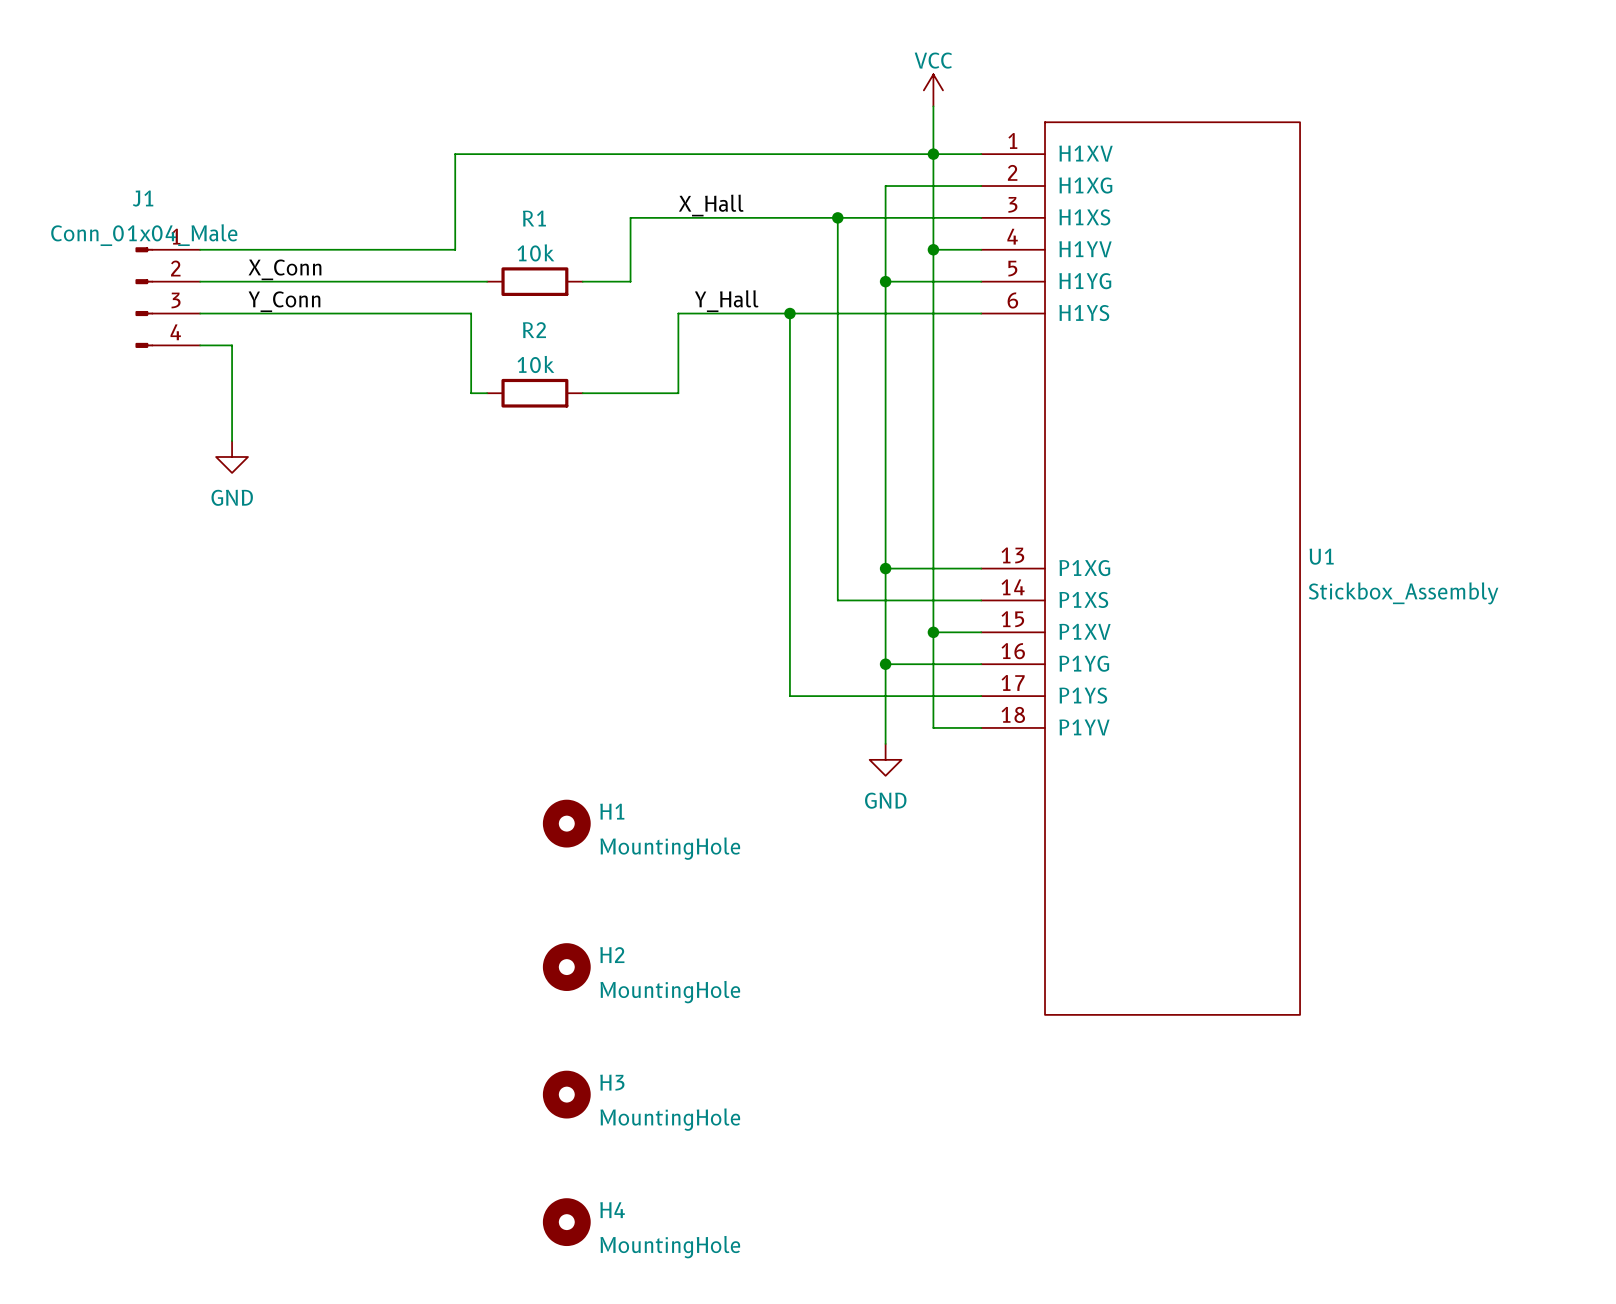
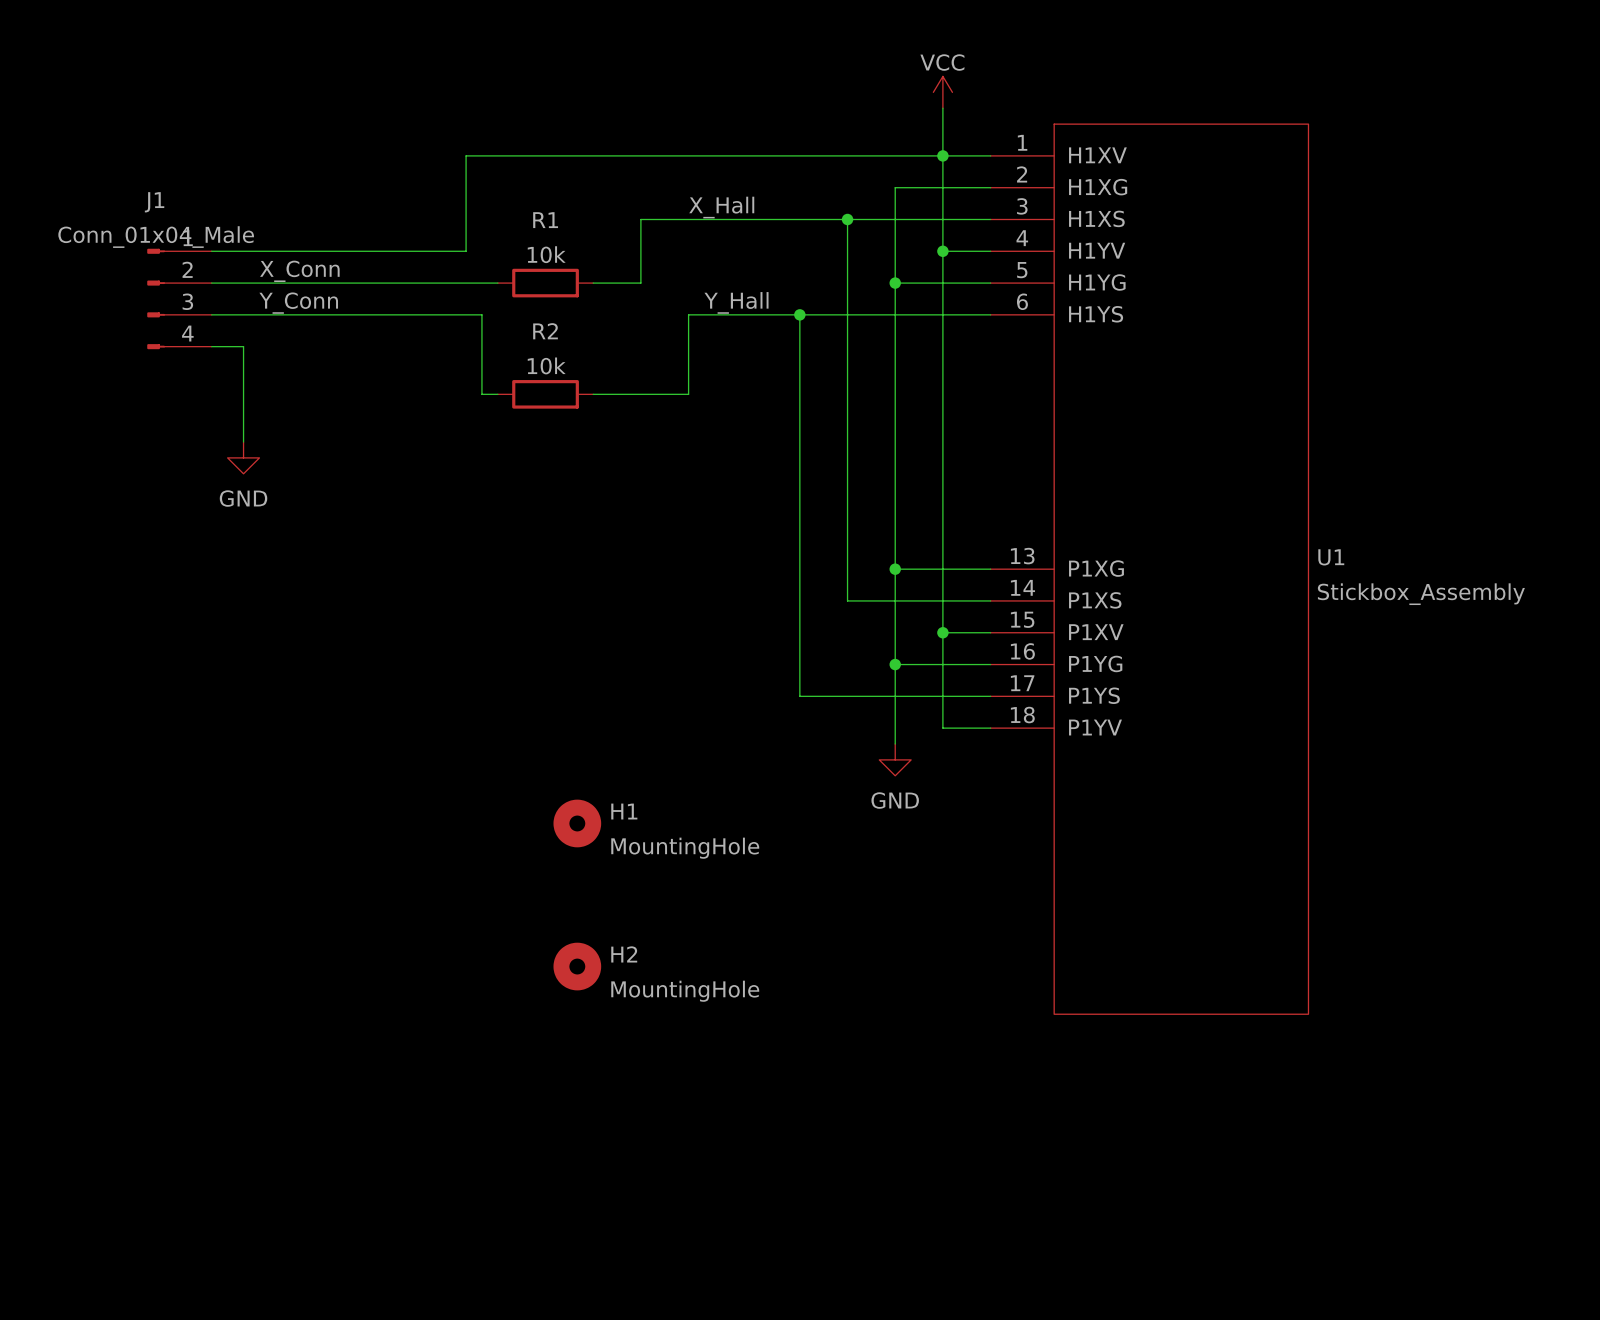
H3: MountingHole (566, 1094) -> none
H4: MountingHole (566, 1222) -> none

